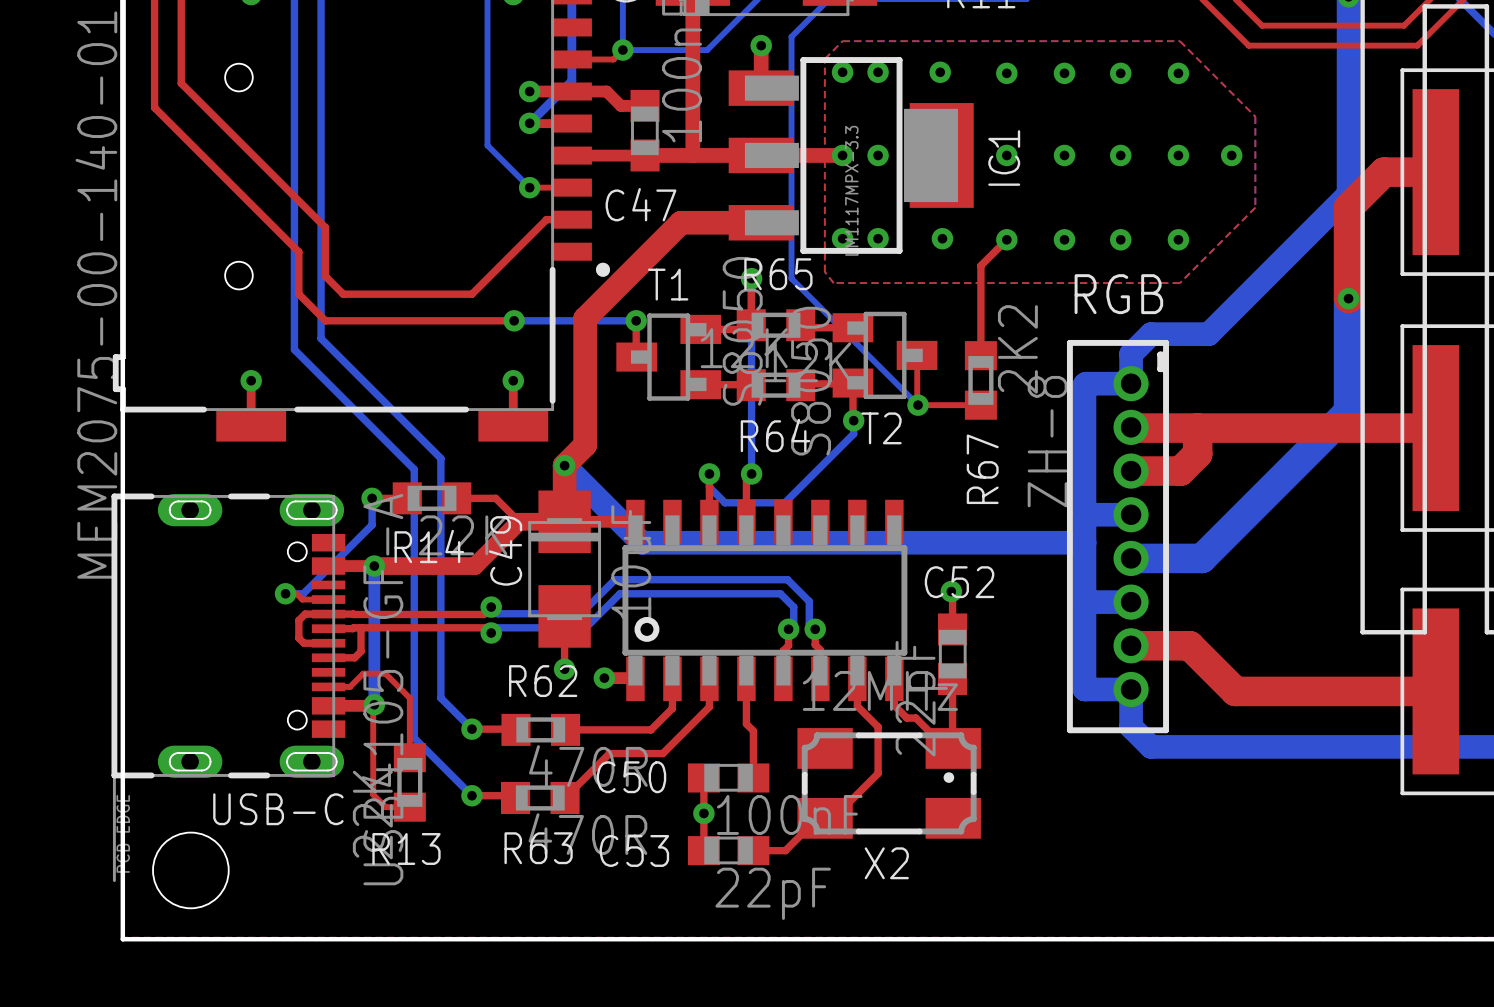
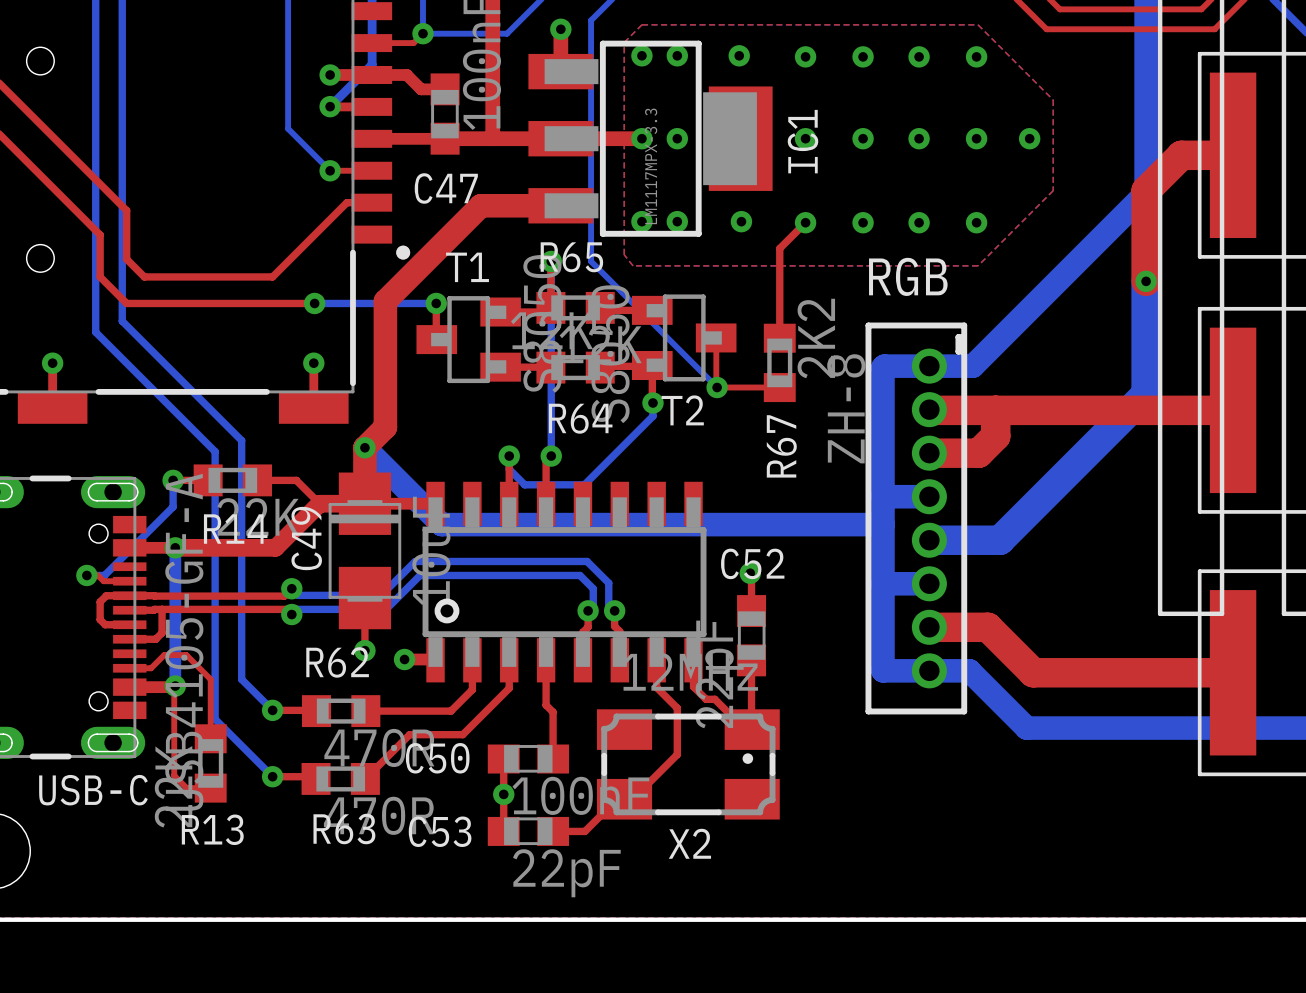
bottom track: (1348, 194) (1208, 334) (1151, 334) (1131, 354) (1131, 383) -> (1146, 177) (1146, 192) (972, 366) (929, 366)
bottom track: (1131, 689) (1131, 726) (1151, 746) (1228, 746) -> (929, 670) (969, 670) (1026, 728)

